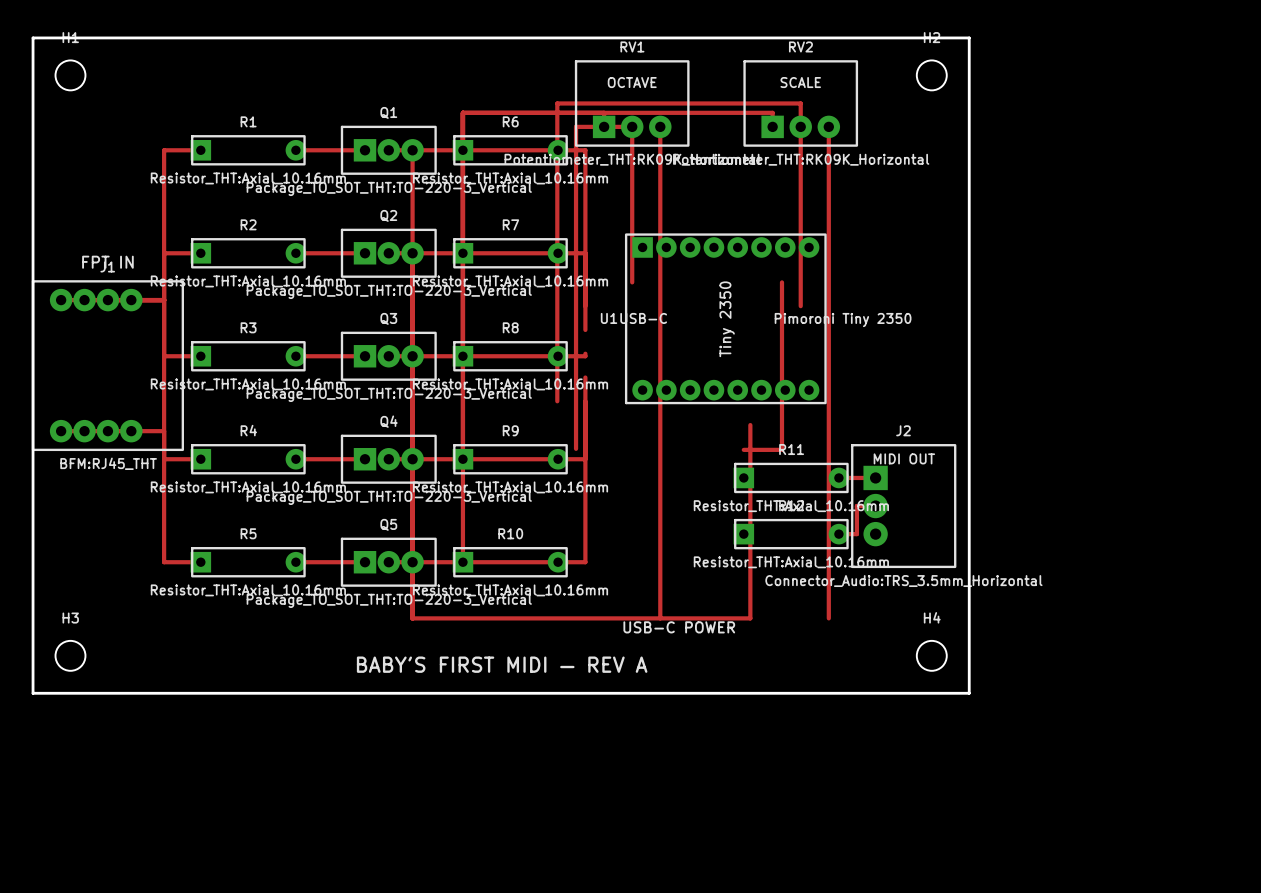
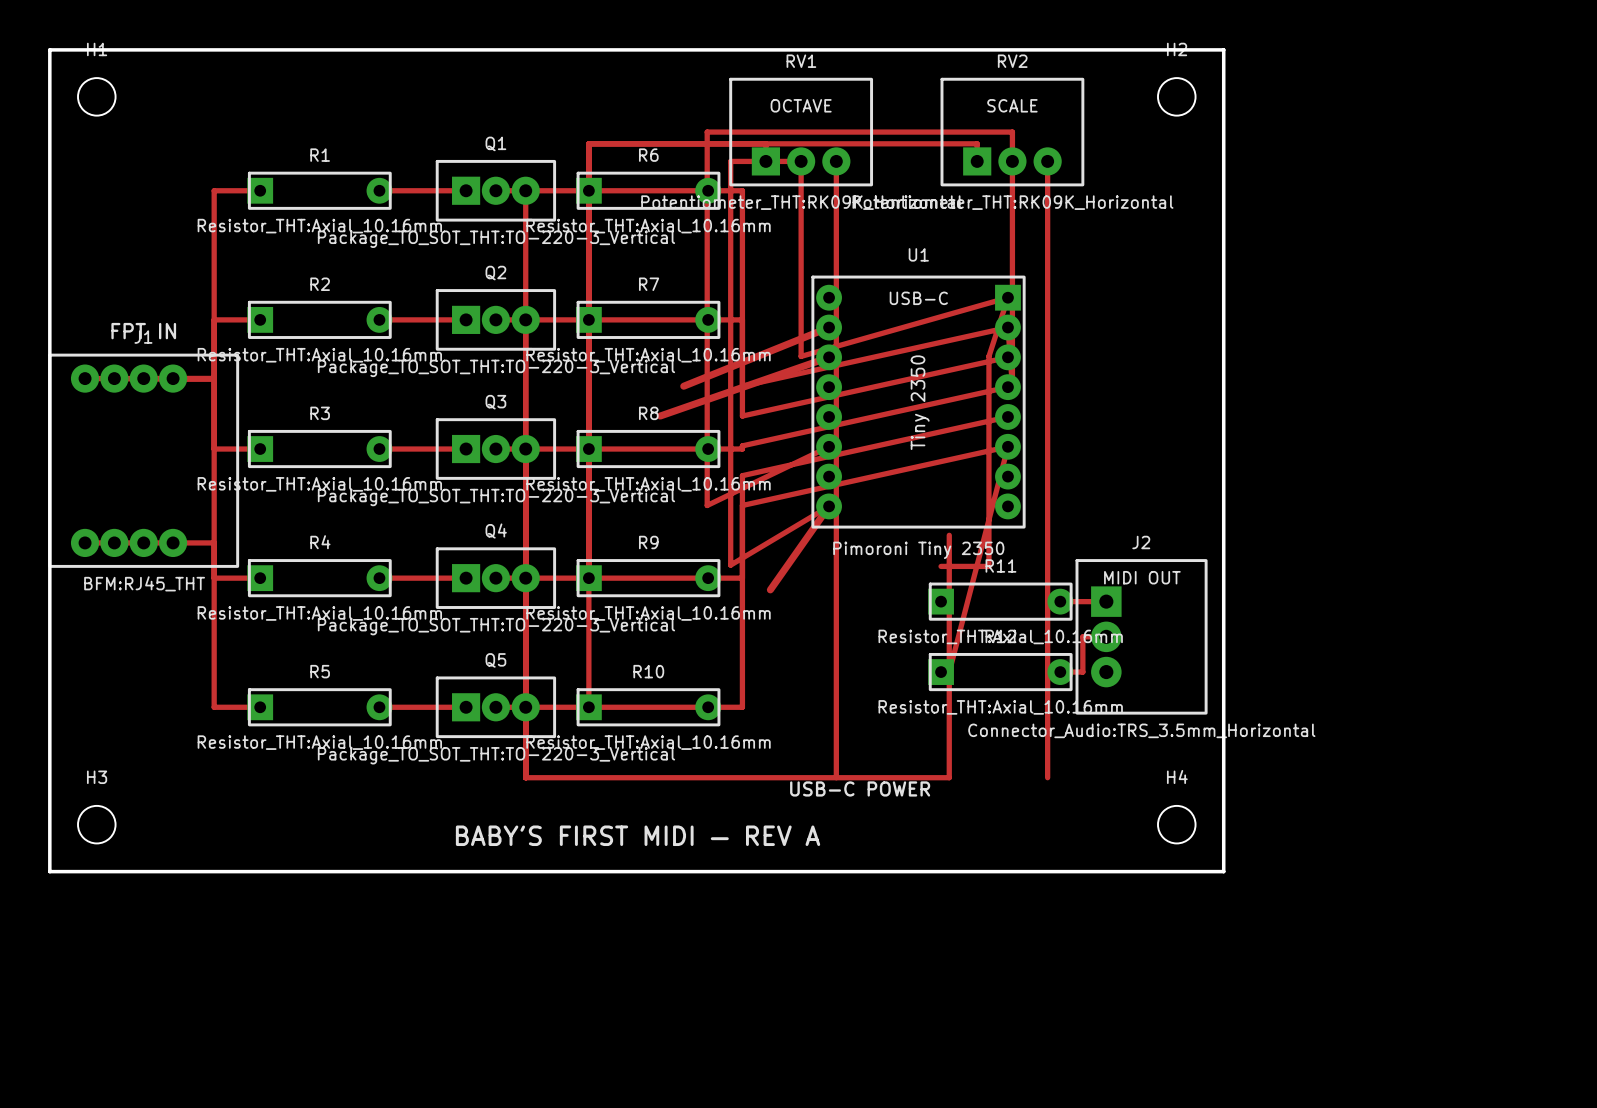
top track: none -> (829, 327) (683, 386)
top track: none -> (801, 356) (1007, 297) (988, 356)
top track: none -> (829, 357) (660, 416)
top track: none -> (1007, 357) (742, 416)
top track: none -> (742, 386) (1007, 327) (1012, 386)
top track: none -> (1007, 387) (742, 445)
U1 rotation: 0° (725, 318) -> 90° clockwise (918, 402)
top track: none -> (1007, 416) (742, 475)
top track: none -> (829, 446) (707, 505)
top track: none -> (742, 505) (1007, 446) (949, 672)
top track: none -> (730, 565) (829, 506) (770, 589)

